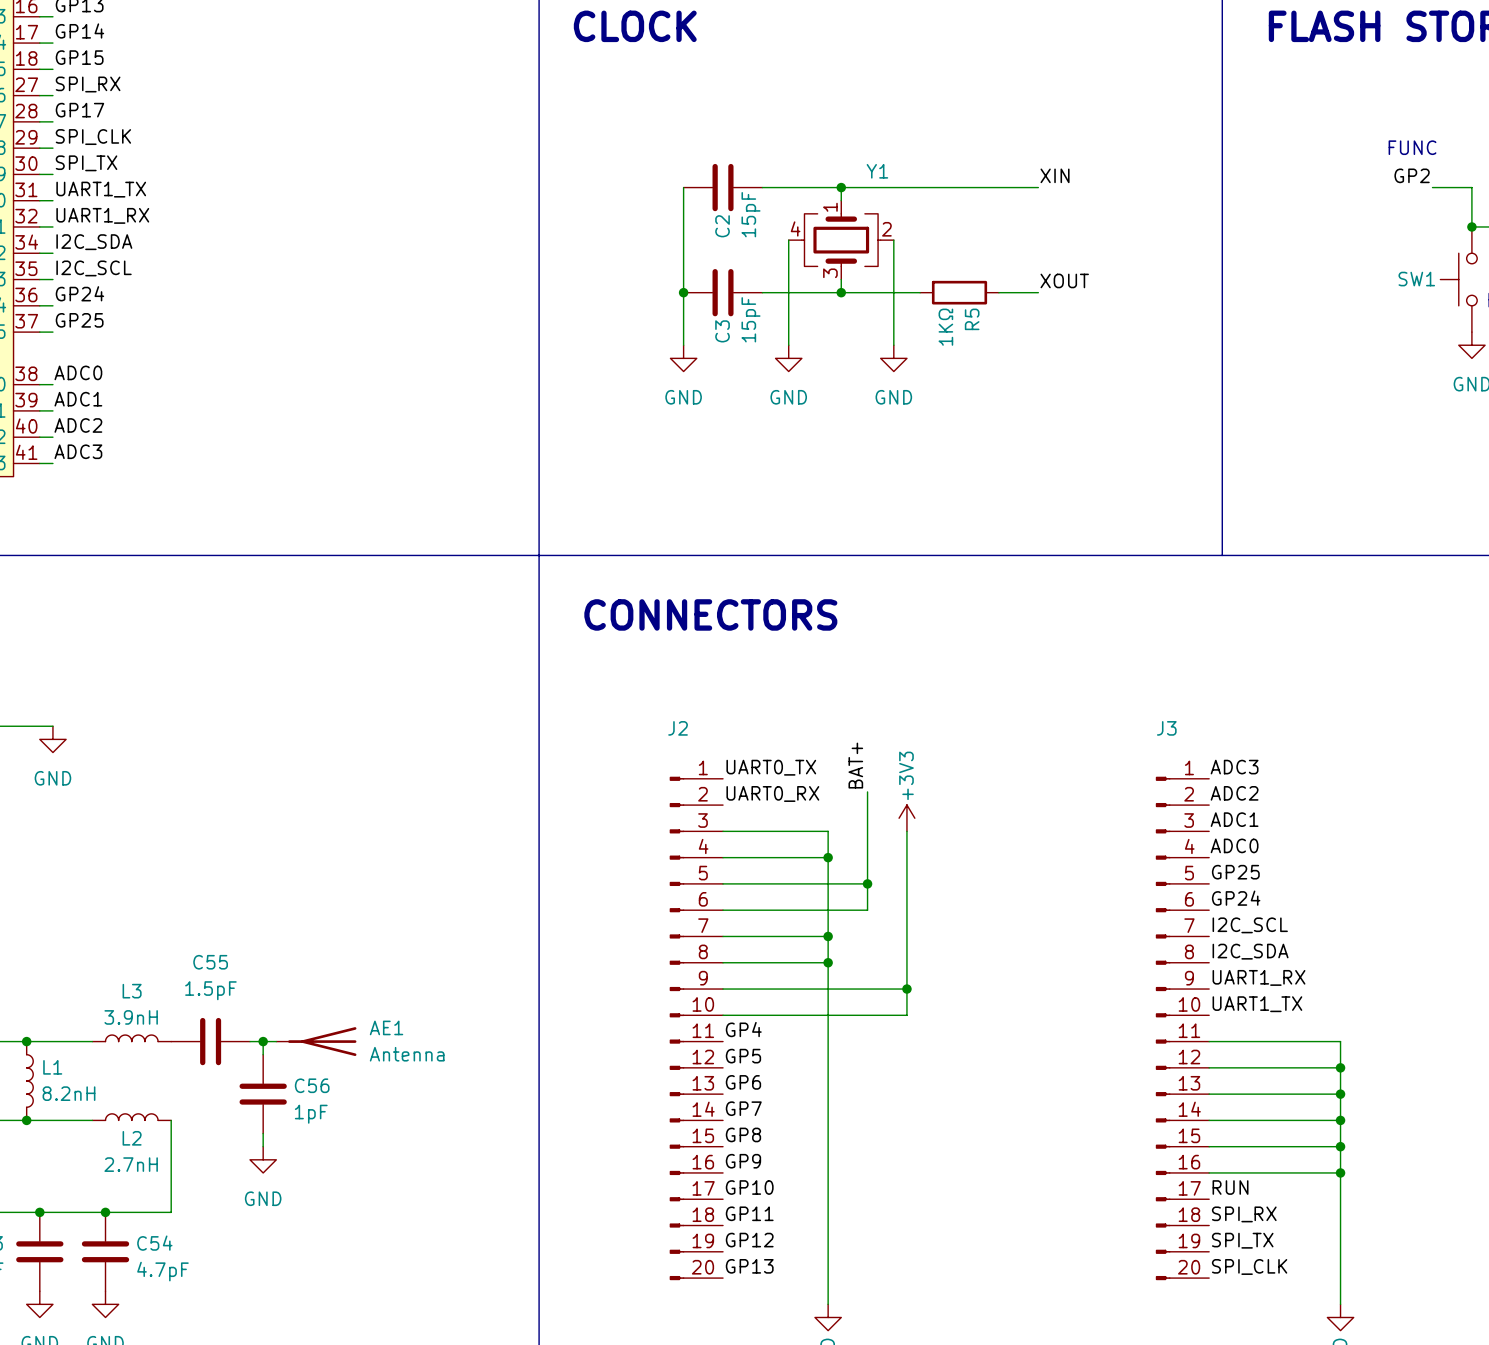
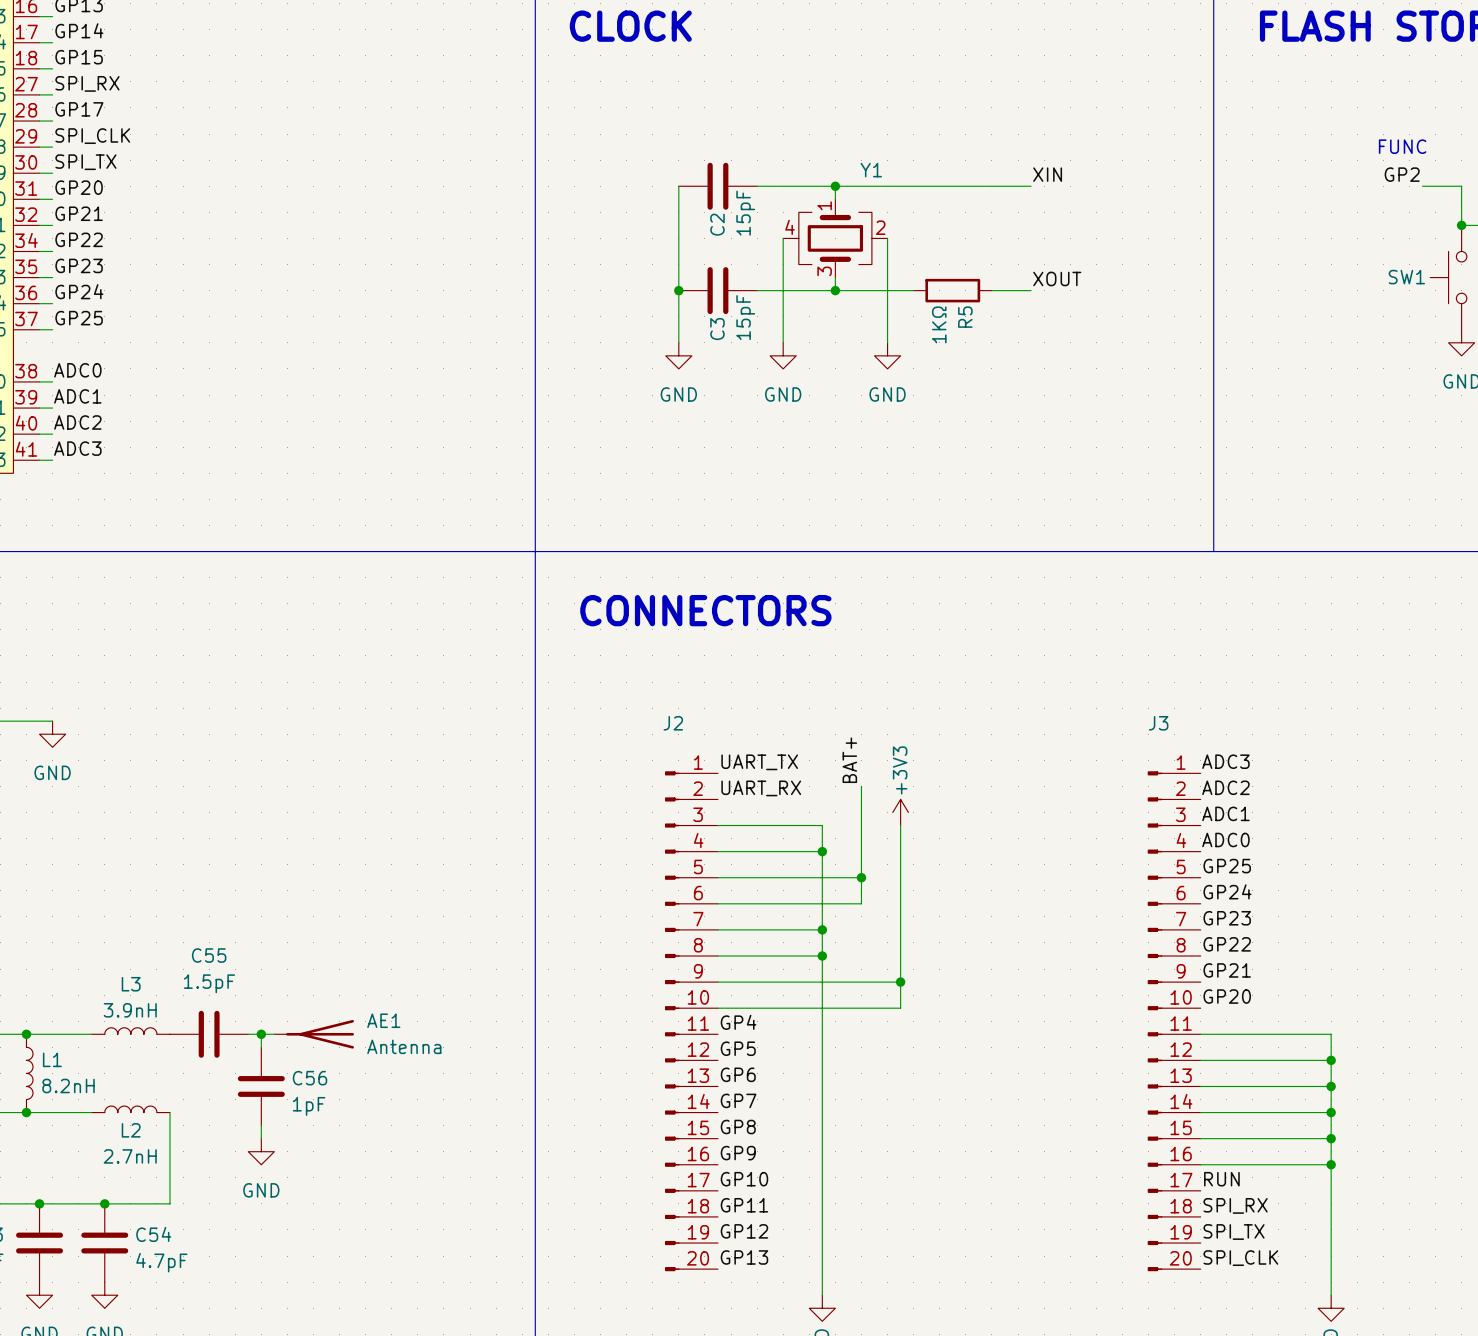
label: UART1_TX (101, 189) -> GP20 (79, 187)
label: UART1_RX (102, 215) -> GP21 (79, 213)
label: I2C_SDA (94, 242) -> GP22 (79, 239)
label: I2C_SCL (94, 268) -> GP23 (79, 265)
label: UART0_TX (771, 767) -> UART_TX (759, 762)
label: UART0_RX (772, 793) -> UART_RX (761, 788)
label: I2C_SCL (1250, 925) -> GP23 (1227, 918)
label: I2C_SDA (1250, 951) -> GP22 (1227, 944)
label: UART1_RX (1258, 977) -> GP21 (1227, 970)
label: UART1_TX (1257, 1004) -> GP20 (1227, 996)

